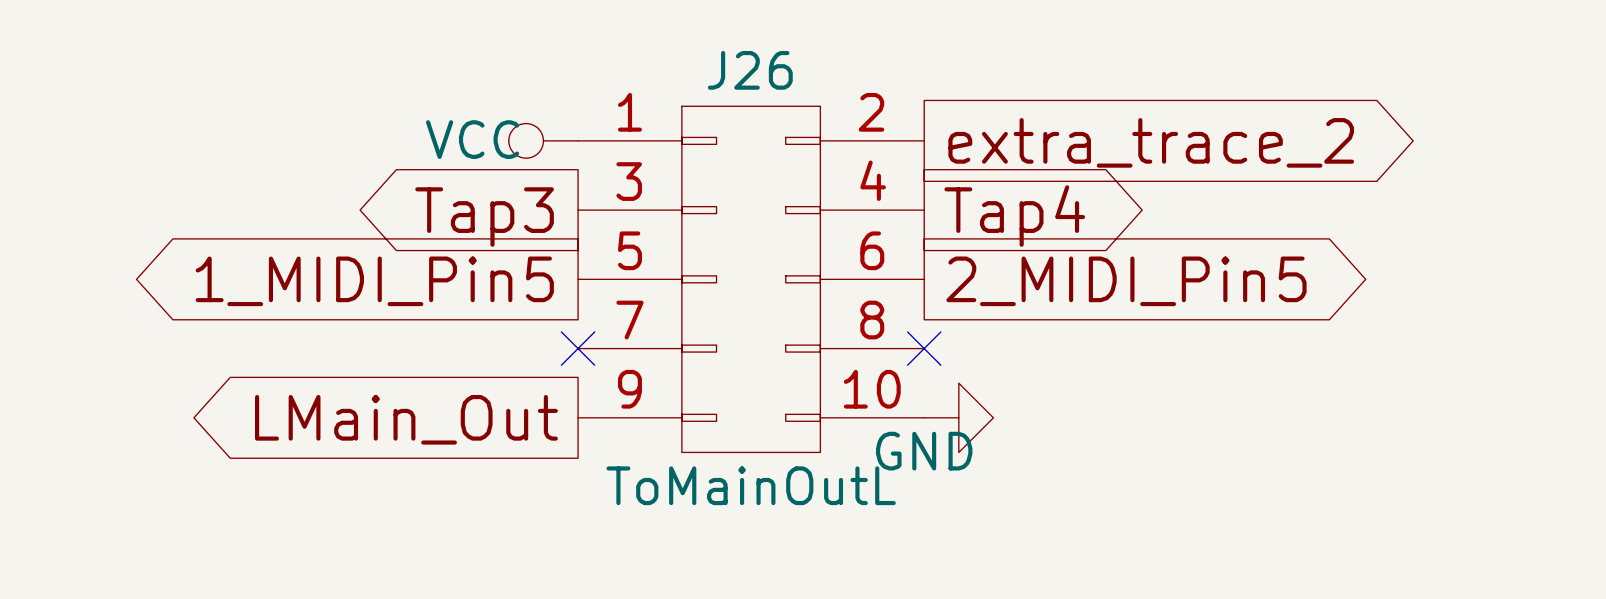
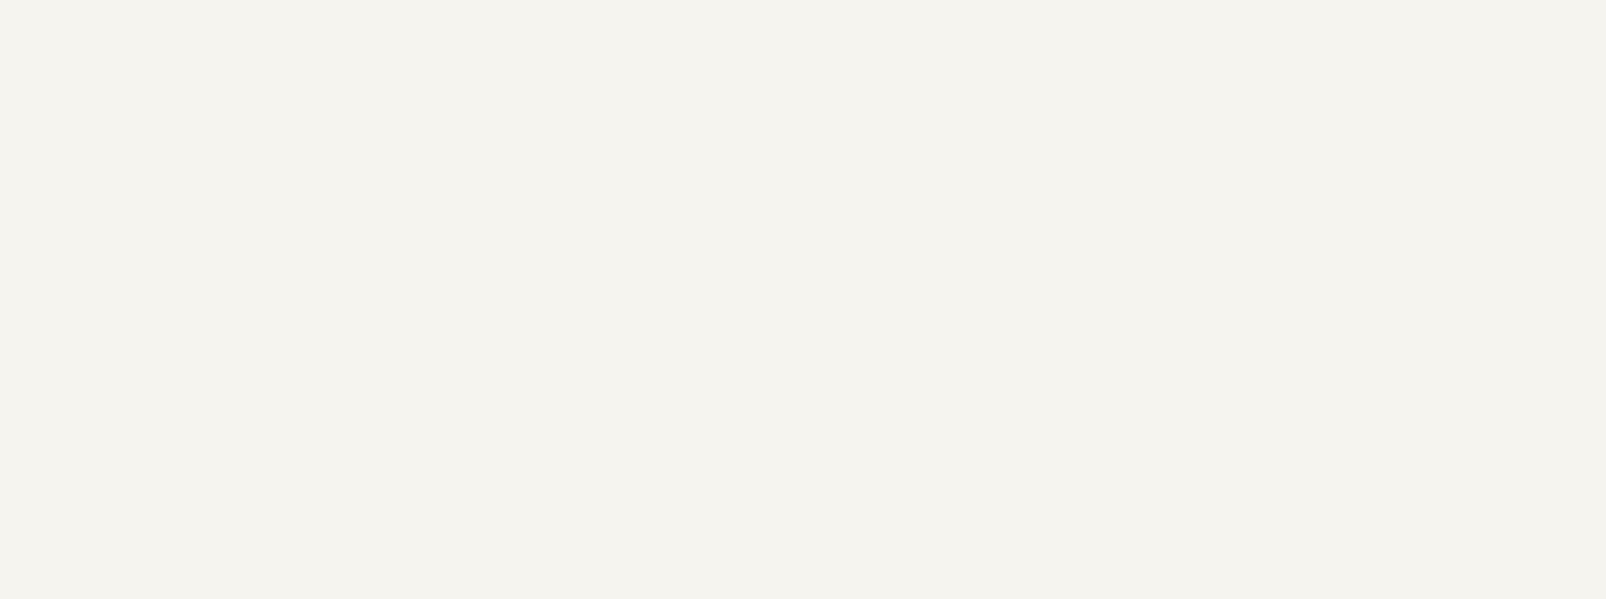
power symbol: VCC (543, 140) -> none
global label: extra_trace_2 (1151, 142) -> none
global label: Tap4 (1014, 216) -> none
global label: Tap3 (484, 217) -> none
J26: ToMainOutL (751, 279) -> none
global label: 1_MIDI_Pin5 (374, 281) -> none
global label: 2_MIDI_Pin5 (1126, 281) -> none
no-connect mark: (578, 348) -> none
no-connect mark: (924, 348) -> none
power symbol: GND (958, 417) -> none
global label: LMain_Out (406, 419) -> none

